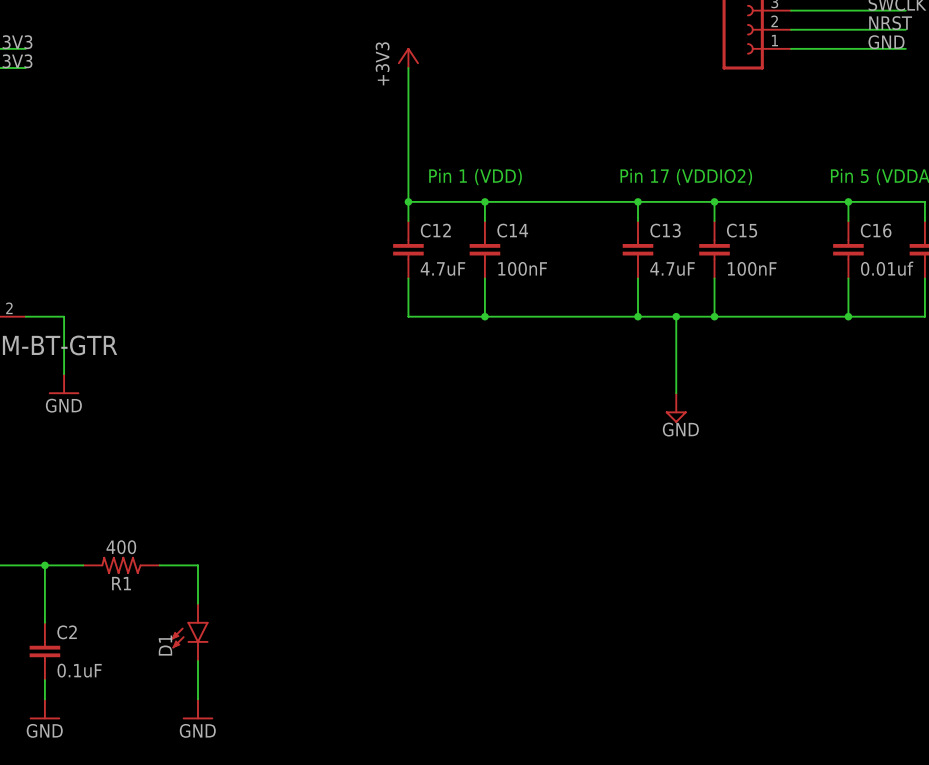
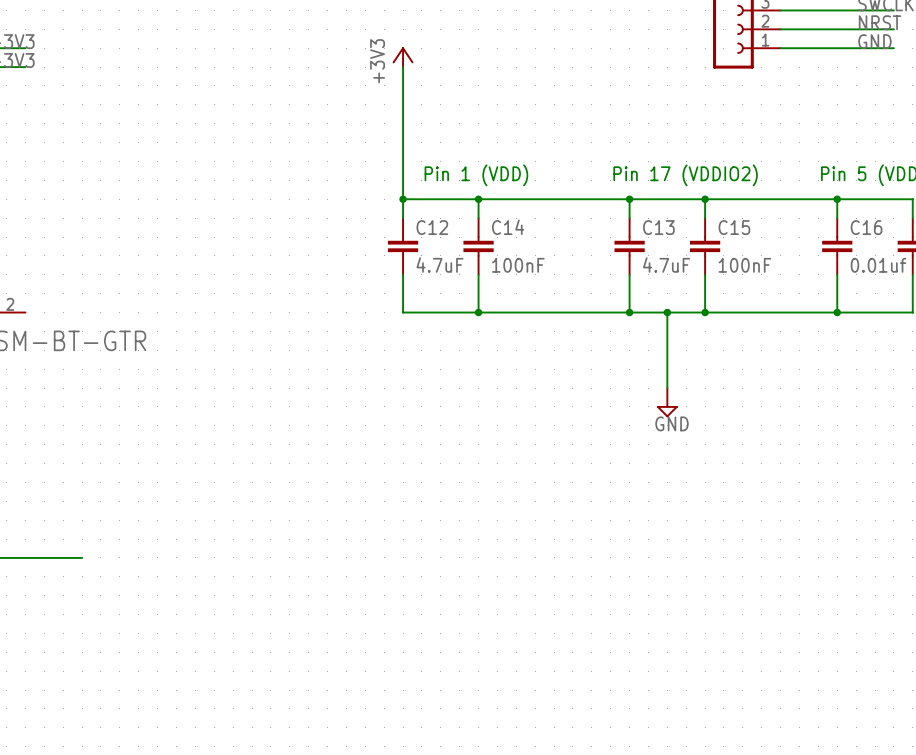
wire: (25, 316) (64, 316) (64, 374) -> none
power symbol: GND (64, 384) -> none
wire: (44, 565) (44, 622) -> none
junction: (44, 565) -> none
R1: 400 (121, 565) -> none
wire: (159, 565) (197, 565) (197, 603) -> none
D1: (190, 632) -> none
C2: 0.1uF (44, 651) -> none
wire: (197, 661) (197, 699) -> none
wire: (44, 680) (44, 699) -> none
power symbol: GND (44, 709) -> none
power symbol: GND (197, 709) -> none

